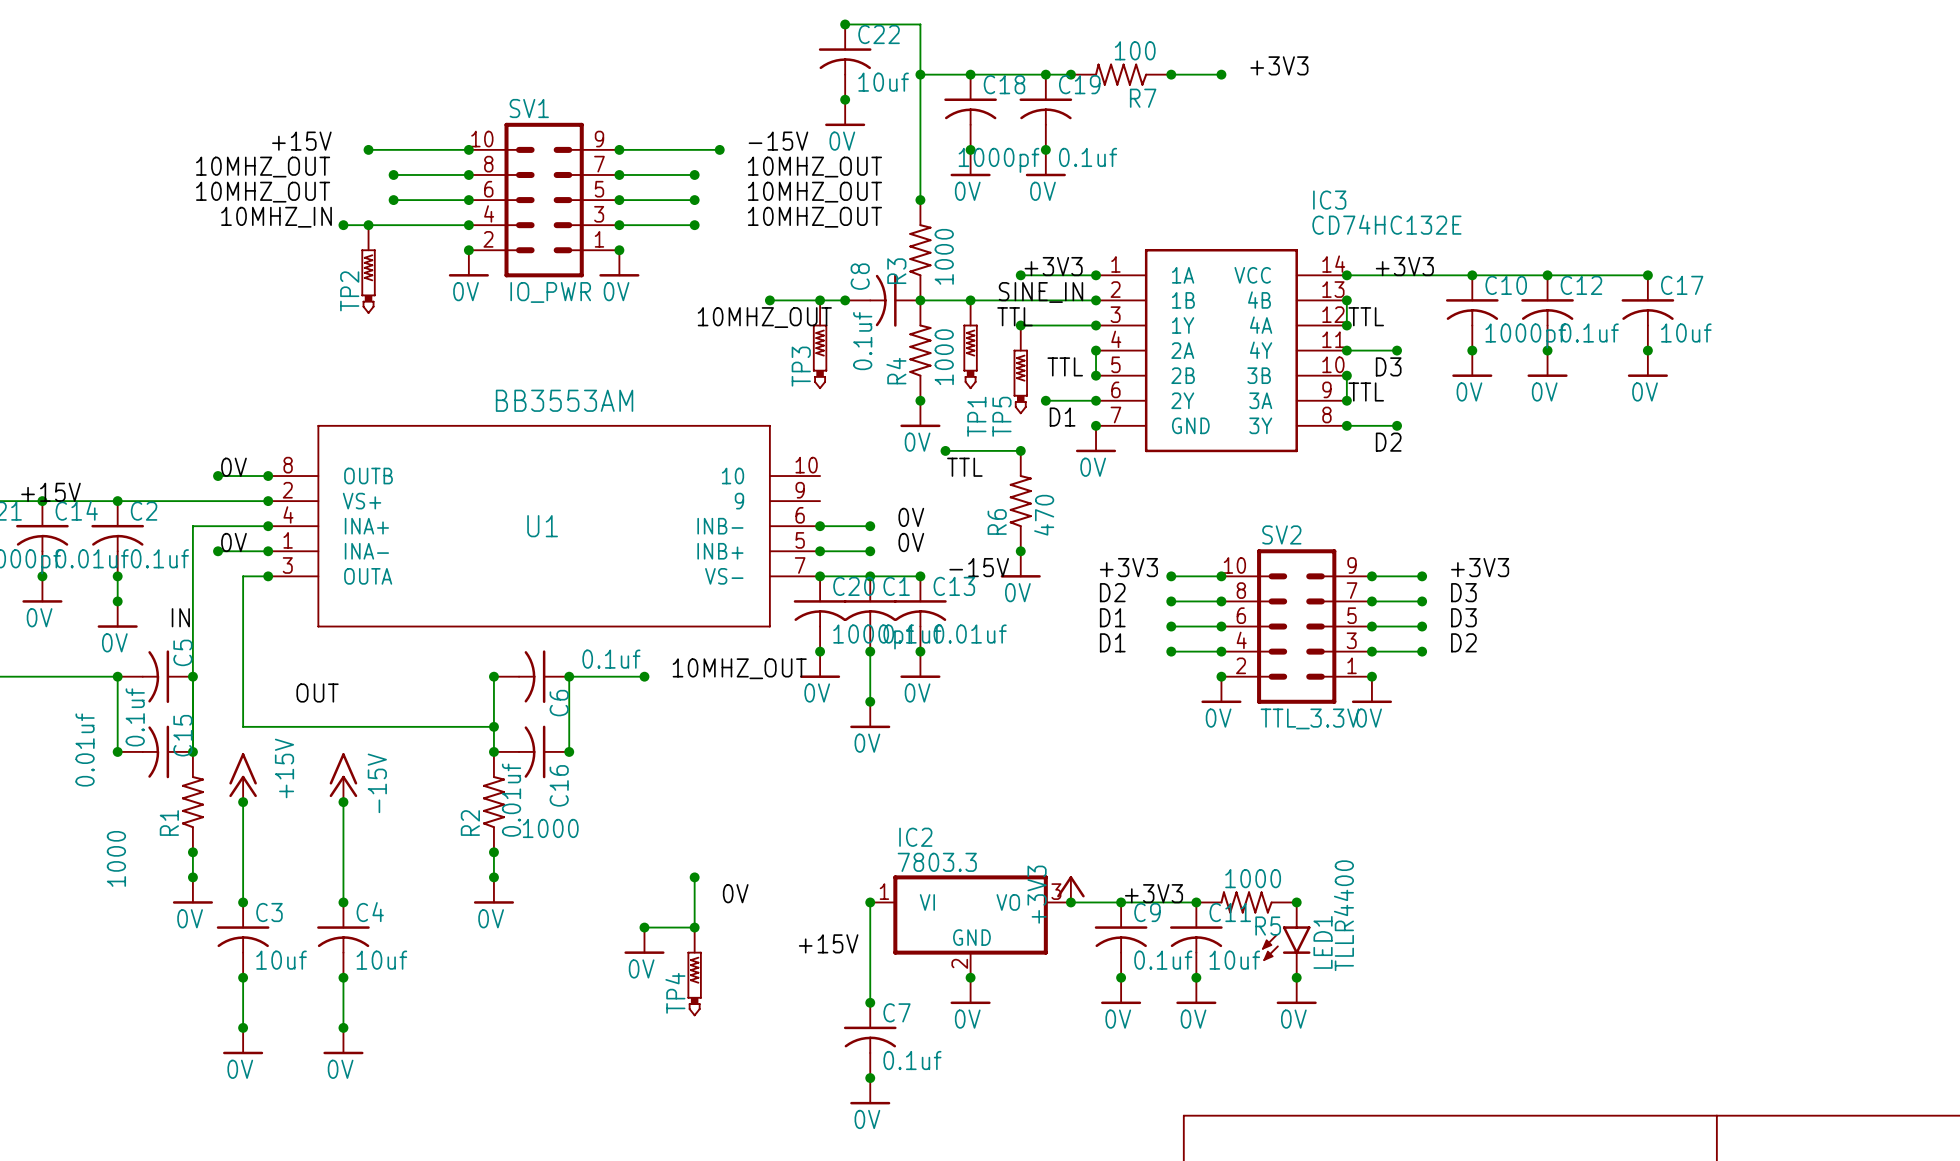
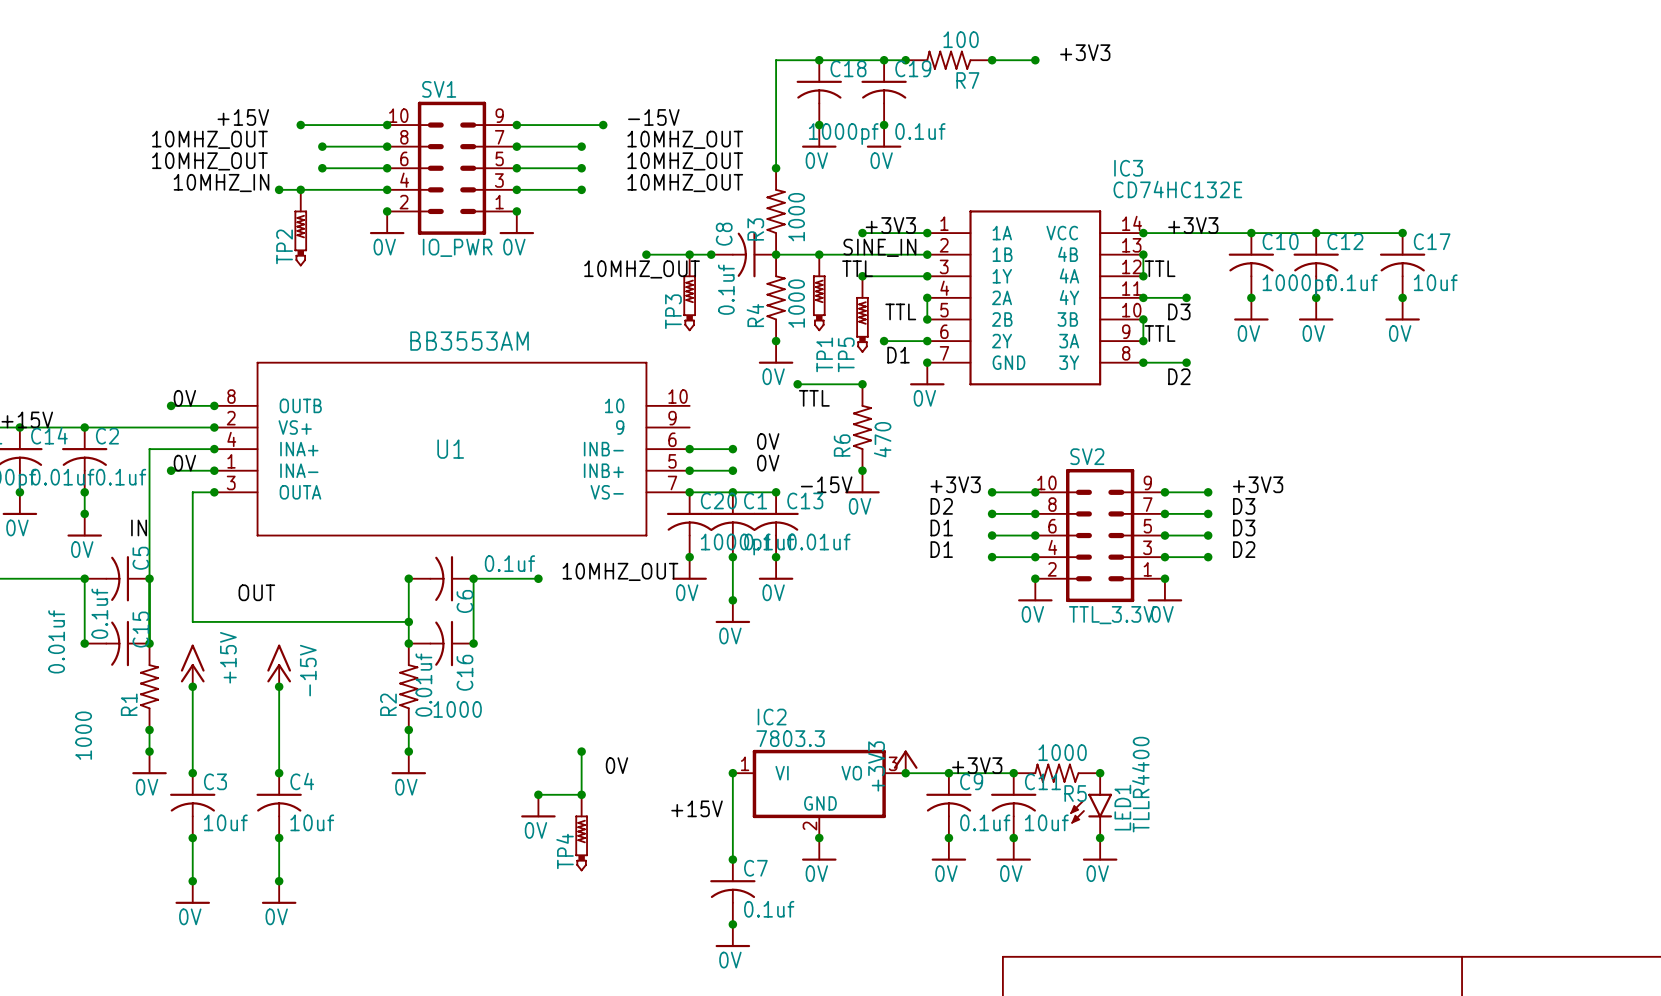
wire: (845, 24) (920, 24) (920, 74) -> none
junction: (845, 24) -> none
C22: 10uf (845, 62) -> none
junction: (920, 74) -> none
junction: (845, 99) -> none
power symbol: 0V (845, 112) -> none

